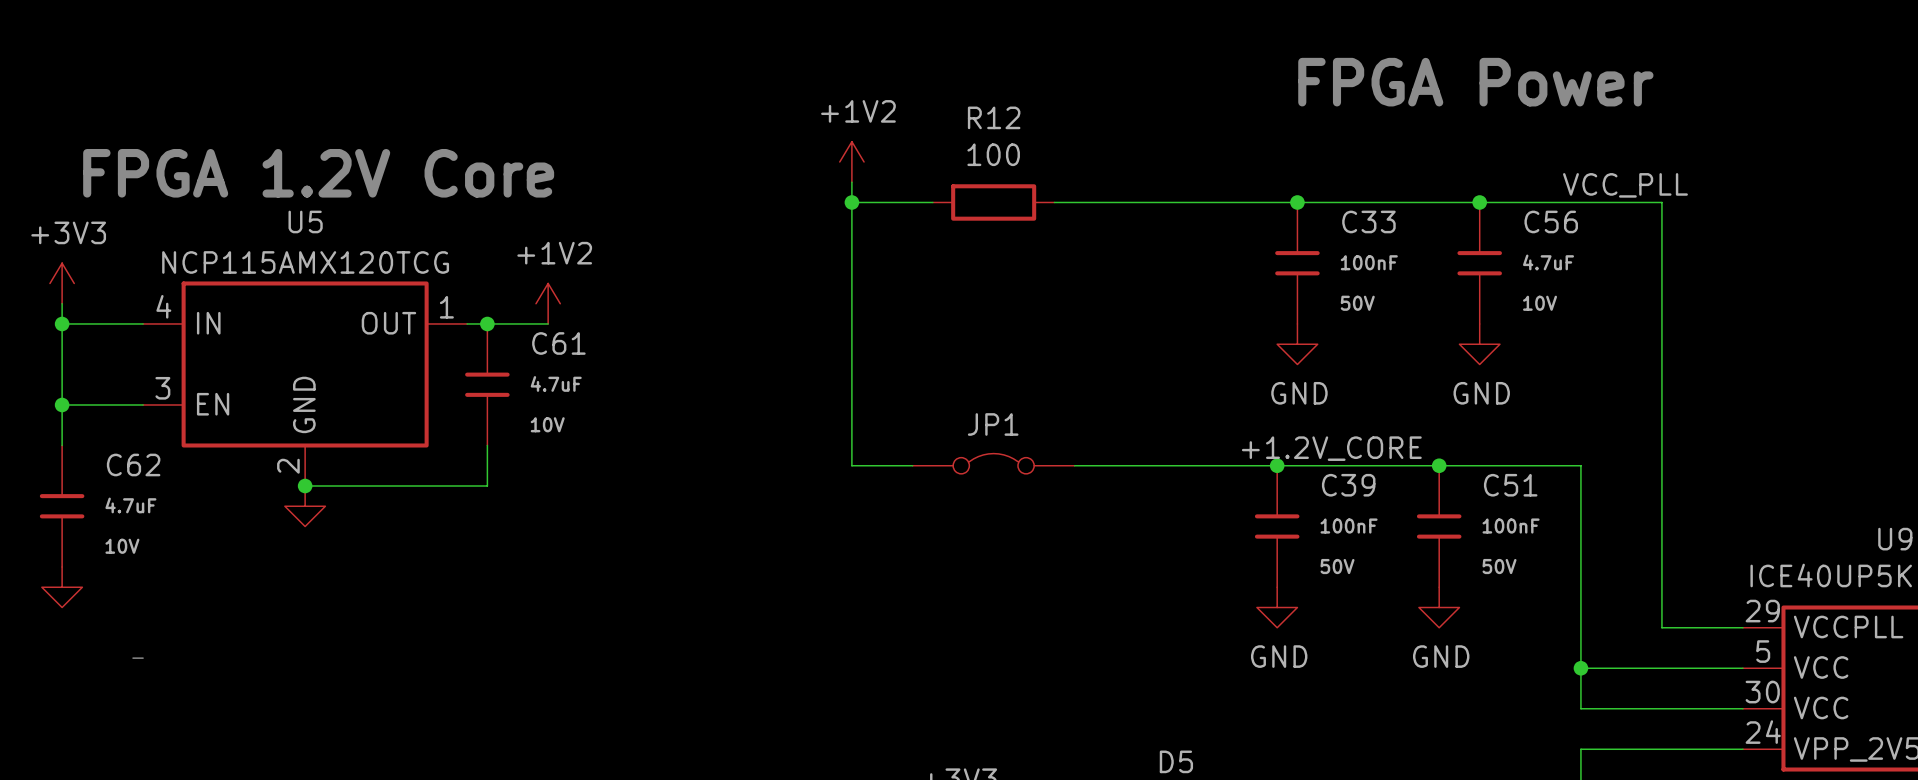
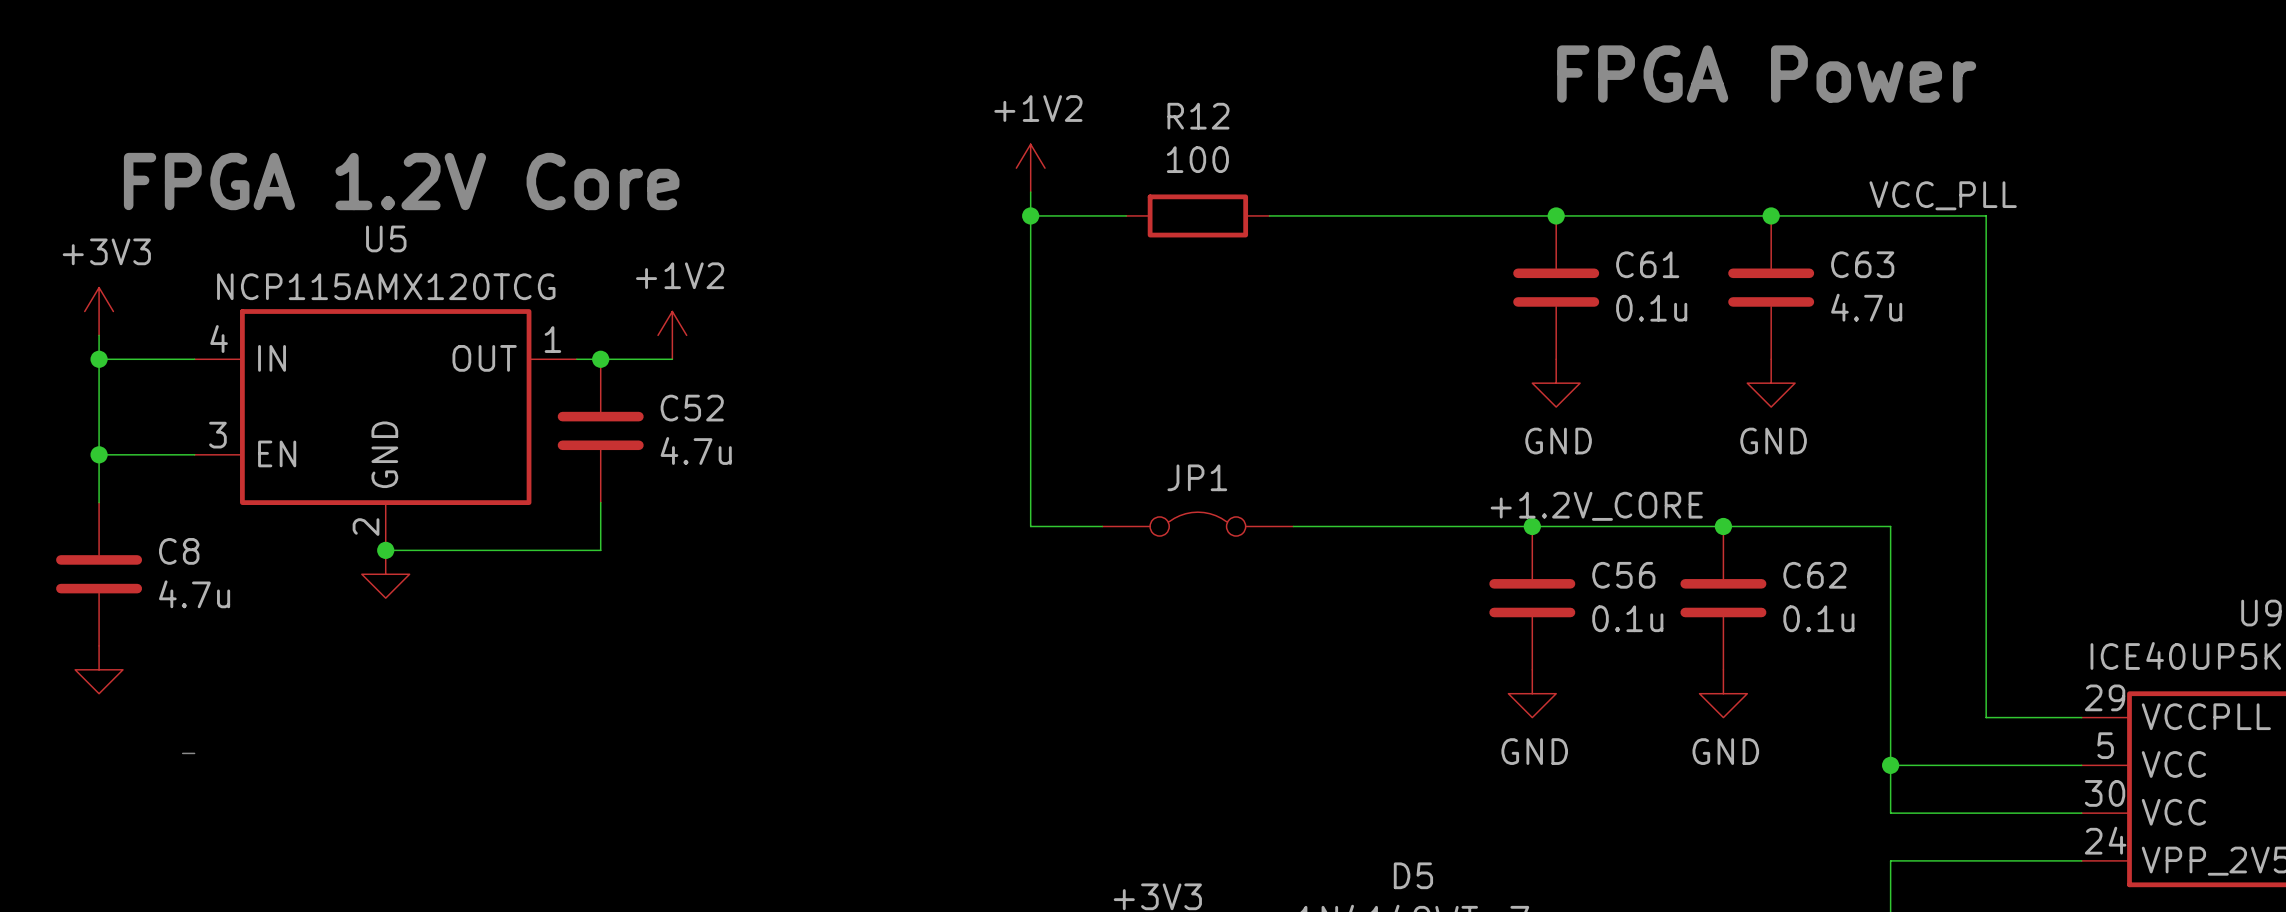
C56 symbol: [1457, 202, 1502, 324] -> [1489, 526, 1576, 670]
C56 value: 4.7uF (1548, 262) -> 0.1u (1627, 618)
C33: 100nF (1297, 263) -> none
C63: none -> 4.7u (1771, 287)
C56 text: 10V (1540, 303) -> none
C61 symbol: [465, 323, 510, 446] -> [1513, 215, 1600, 360]
C61 value: 4.7uF (556, 383) -> 0.1u (1651, 308)
C52: none -> 4.7u (600, 430)
C61 text: 10V (547, 424) -> none
C62 symbol: [39, 445, 85, 568] -> [1680, 526, 1767, 670]
C62 value: 4.7uF (130, 505) -> 0.1u (1818, 618)
C8: none -> 4.7u (99, 574)
C39: 100nF (1277, 526) -> none
C51: 100nF (1439, 526) -> none
C62 text: 10V (122, 546) -> none

